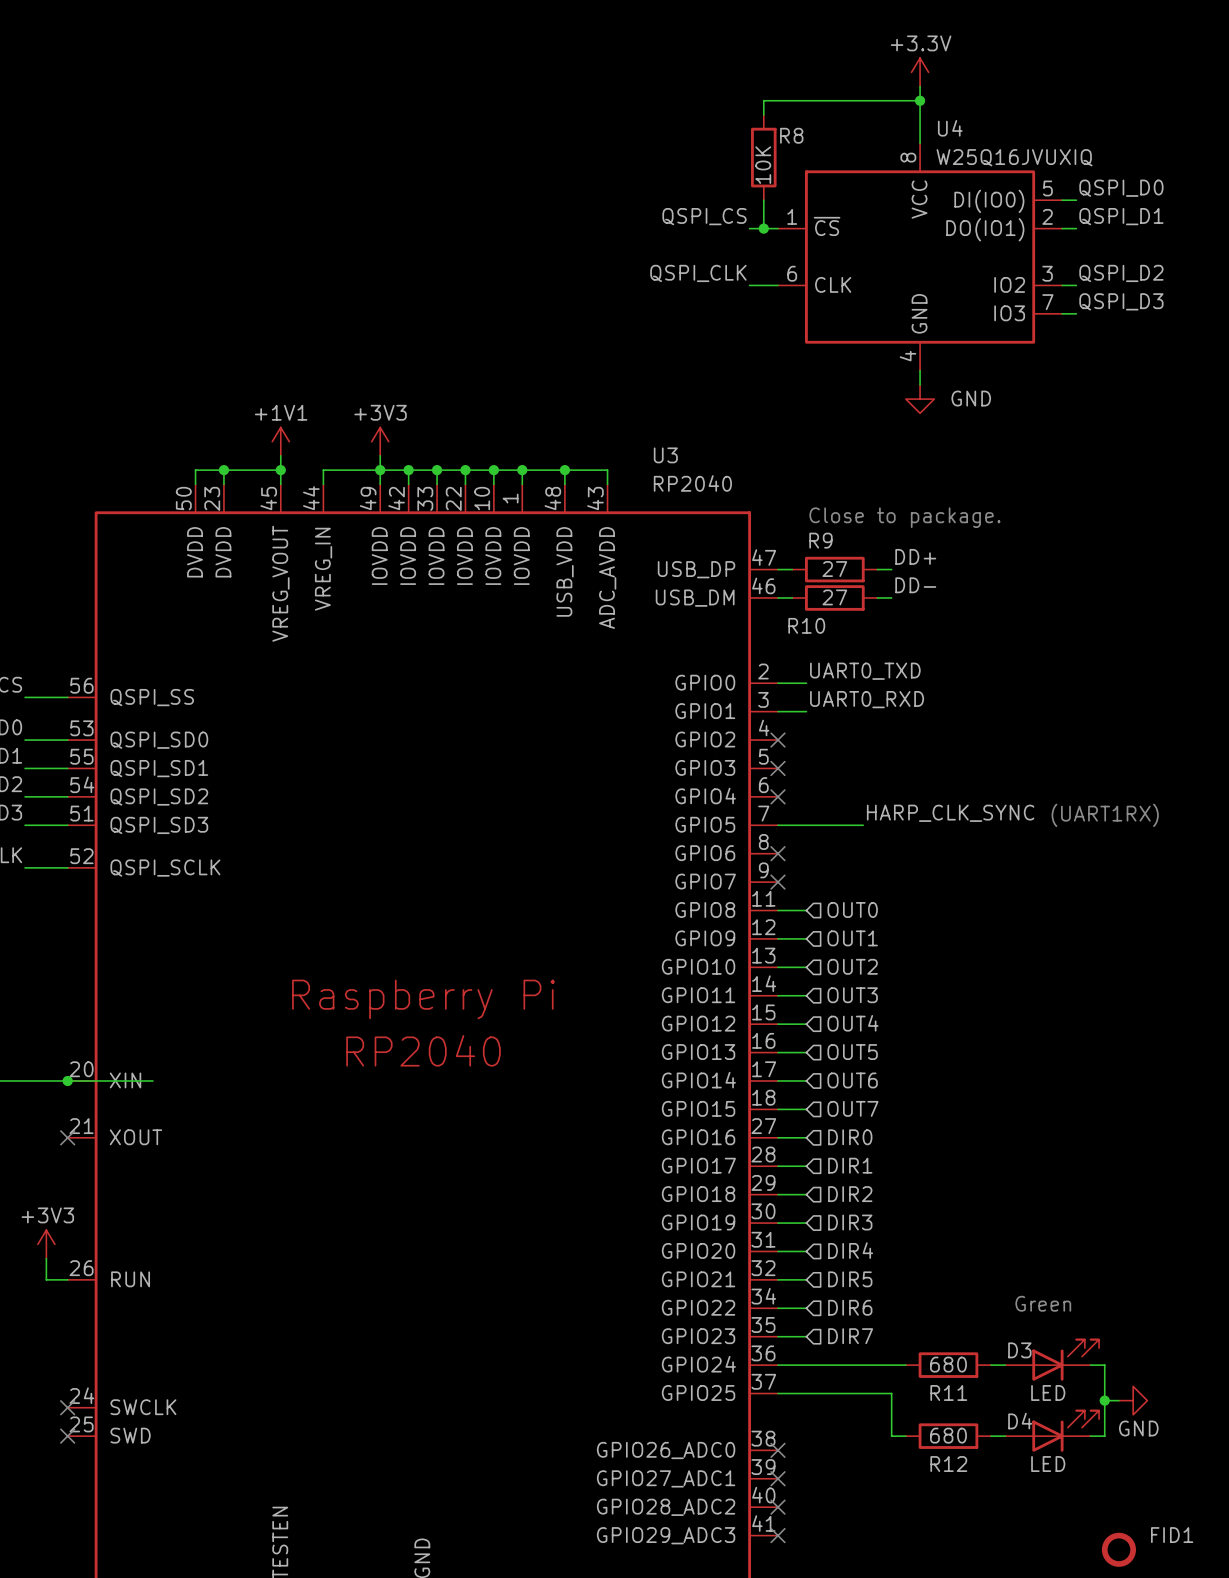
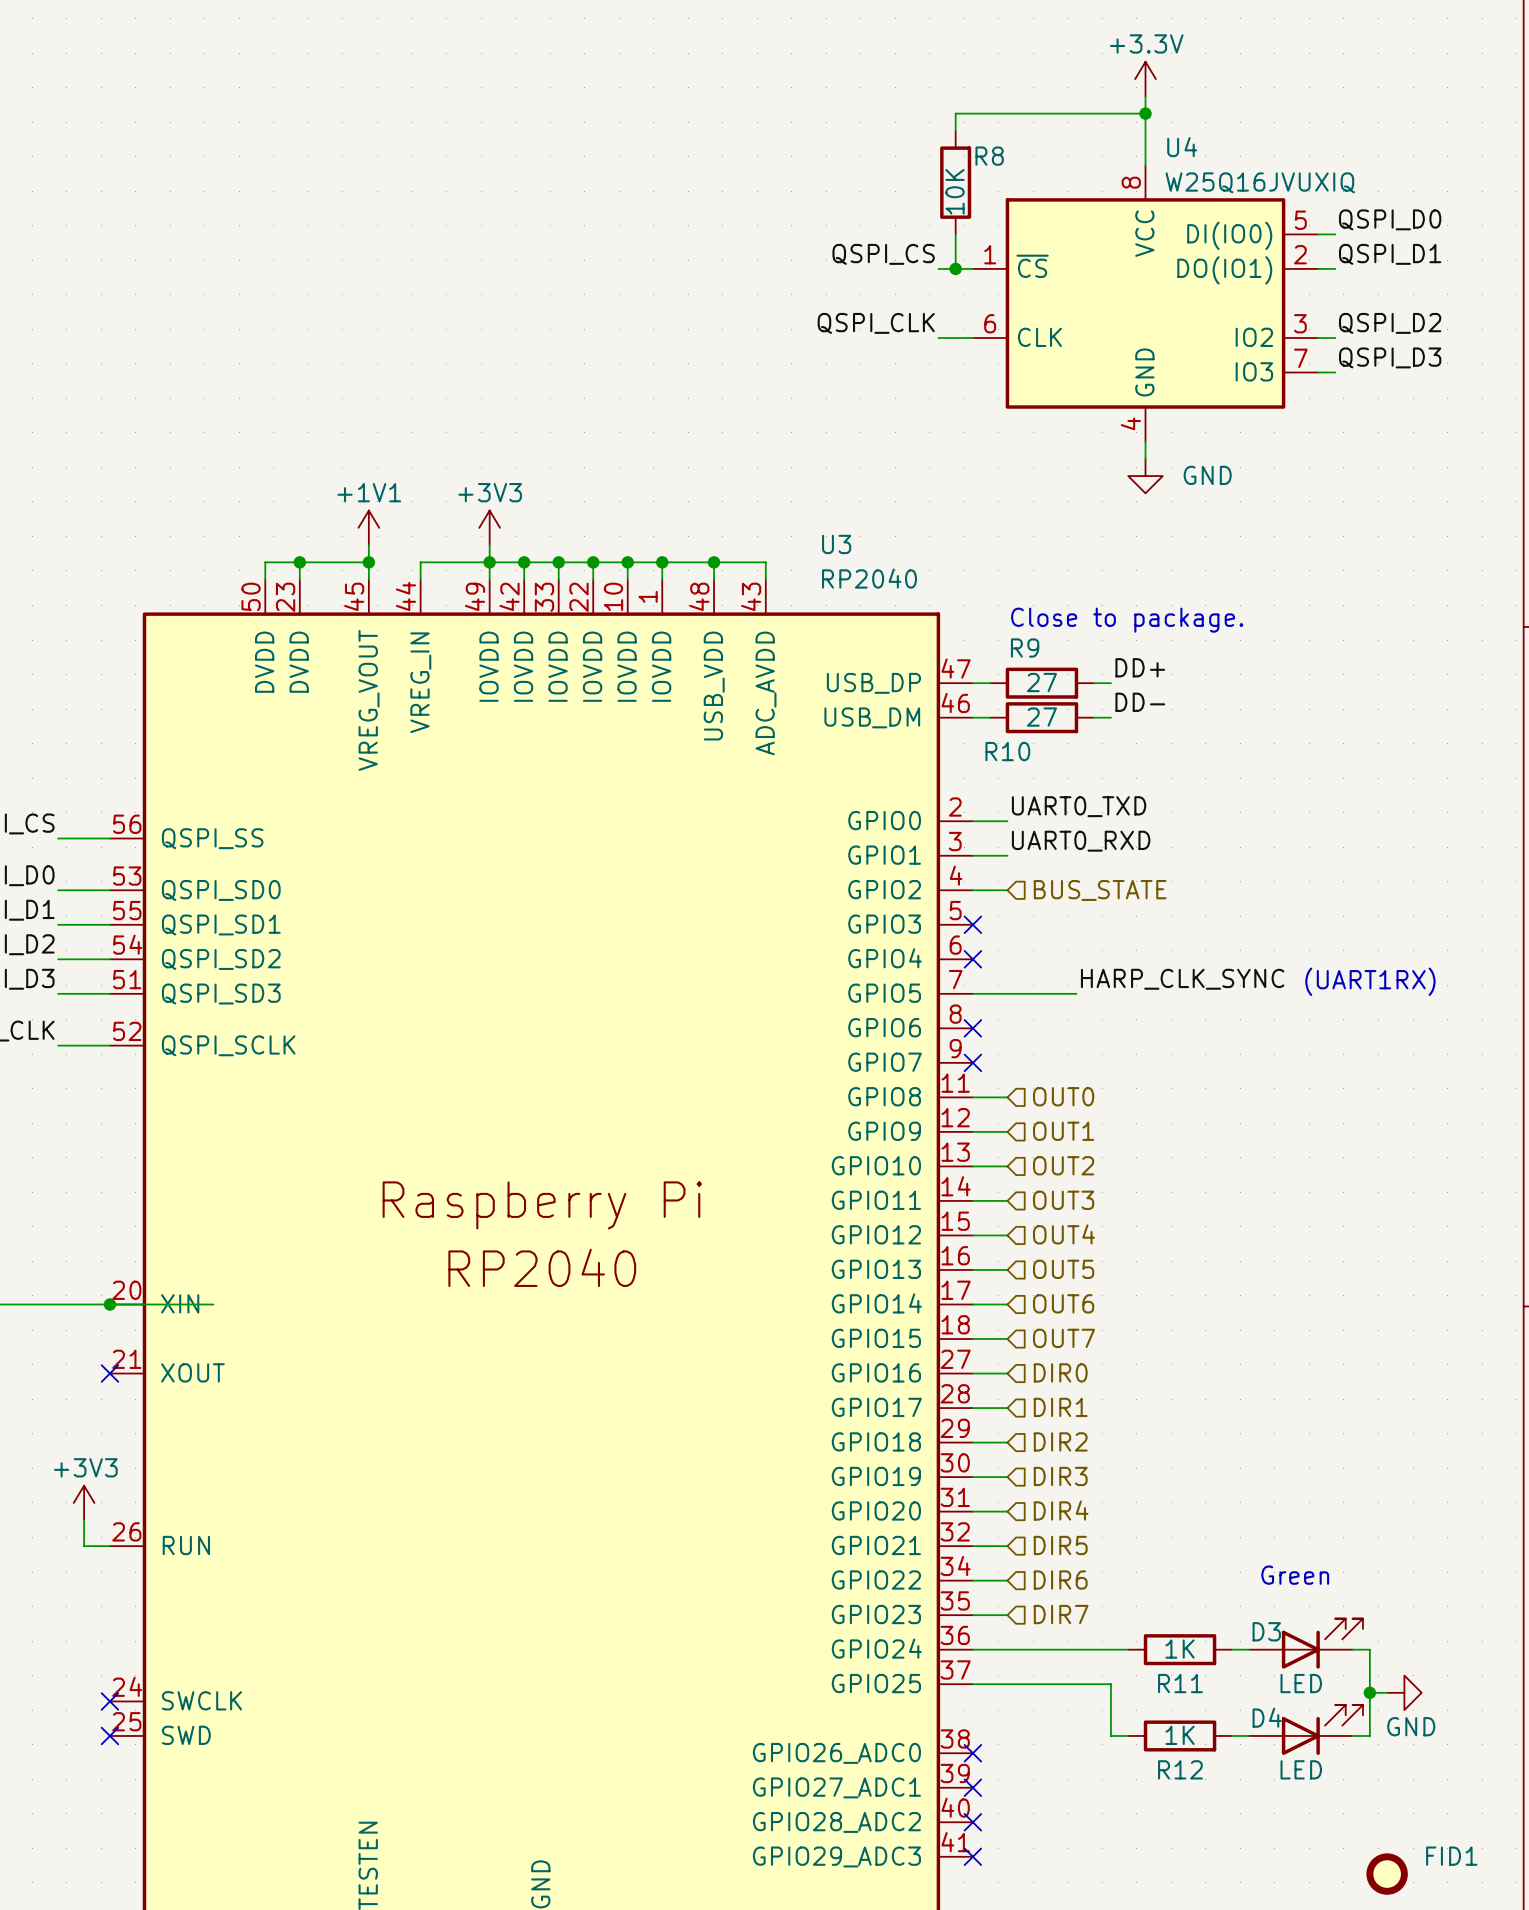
wire: none -> (972, 890) (1007, 890)
no-connect mark: (778, 740) -> none
hierarchical label: none -> BUS_STATE (1100, 890)
R11 value: 680 (948, 1364) -> 1K (1180, 1649)
R12 value: 680 (948, 1435) -> 1K (1180, 1735)

